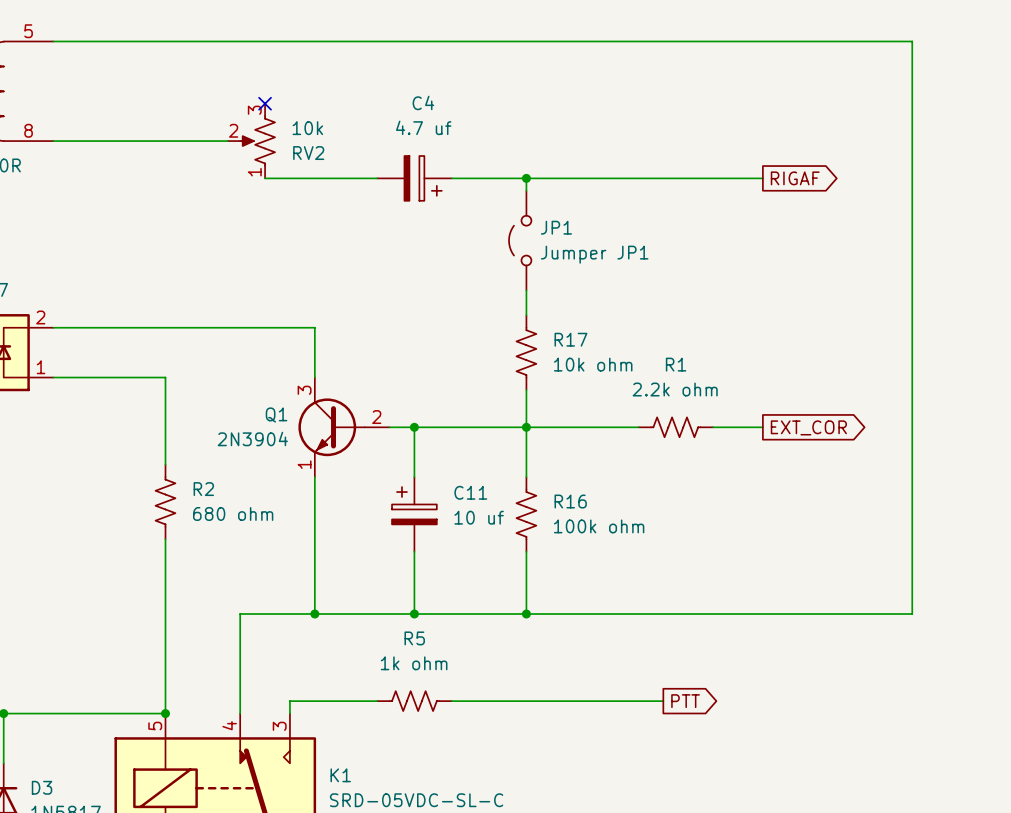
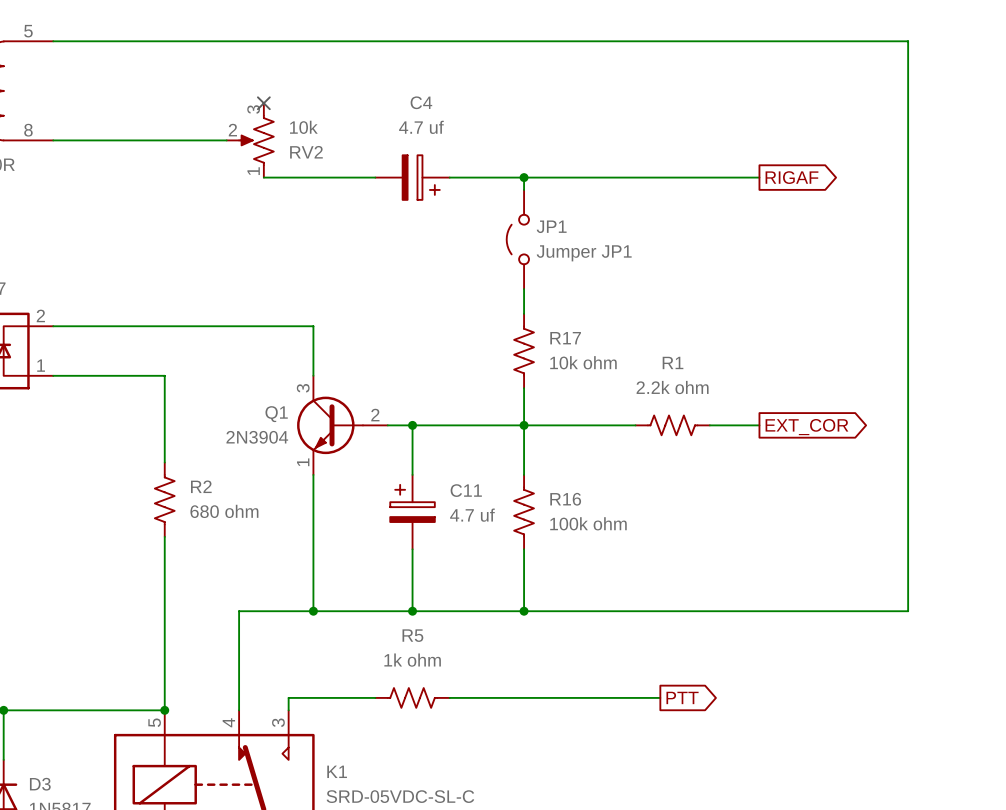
C11 value: 10 uf (479, 517) -> 4.7 uf (472, 515)

